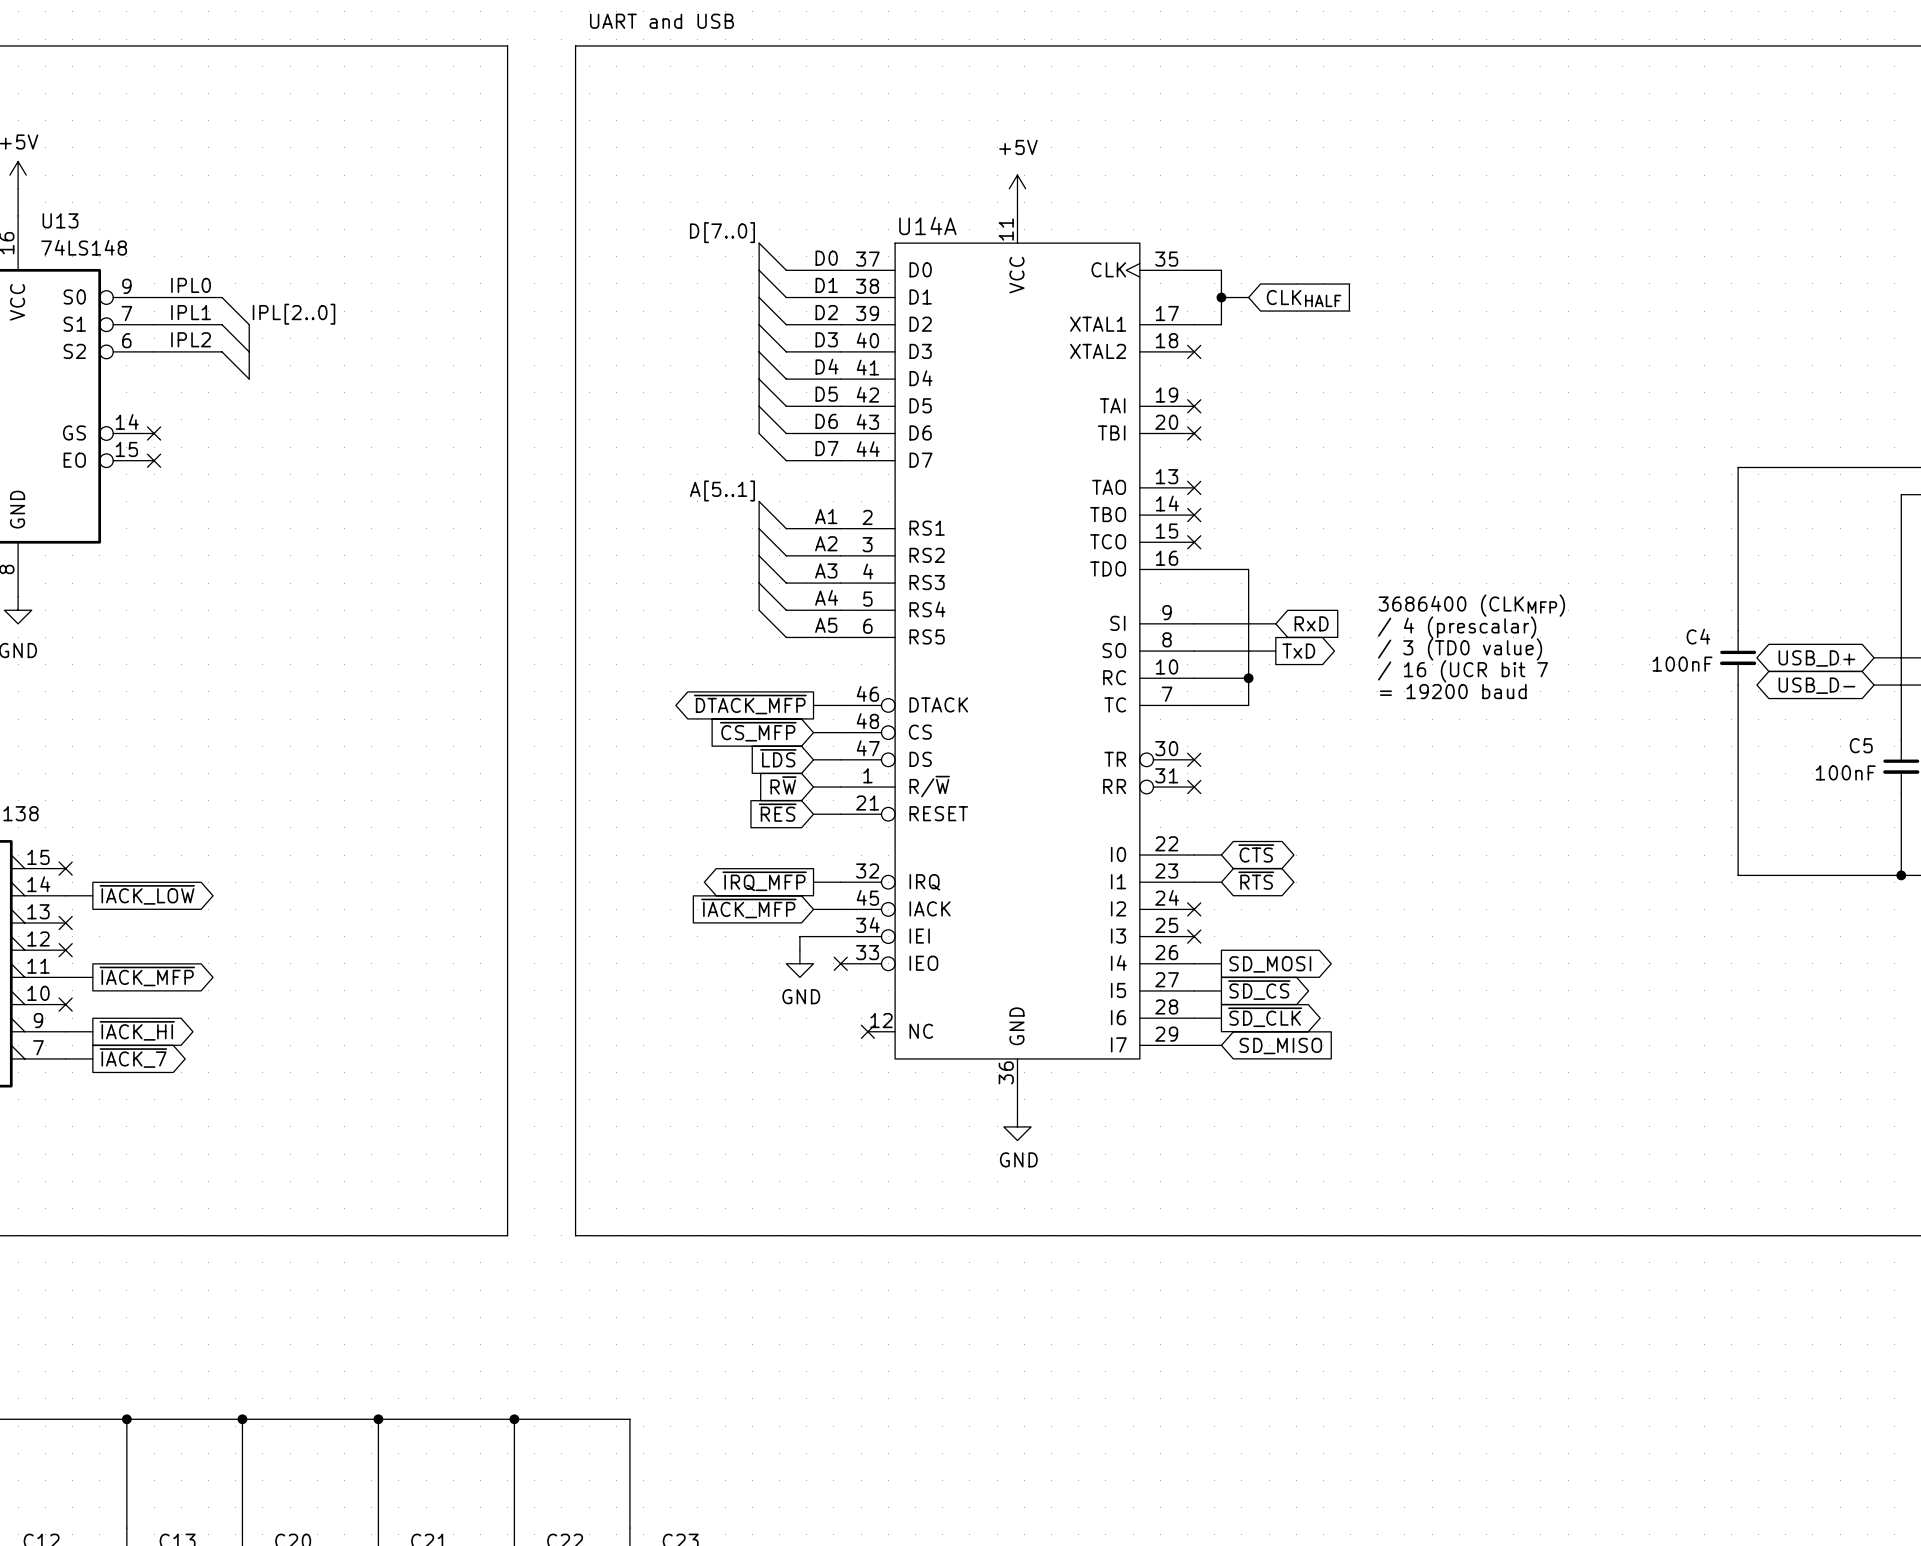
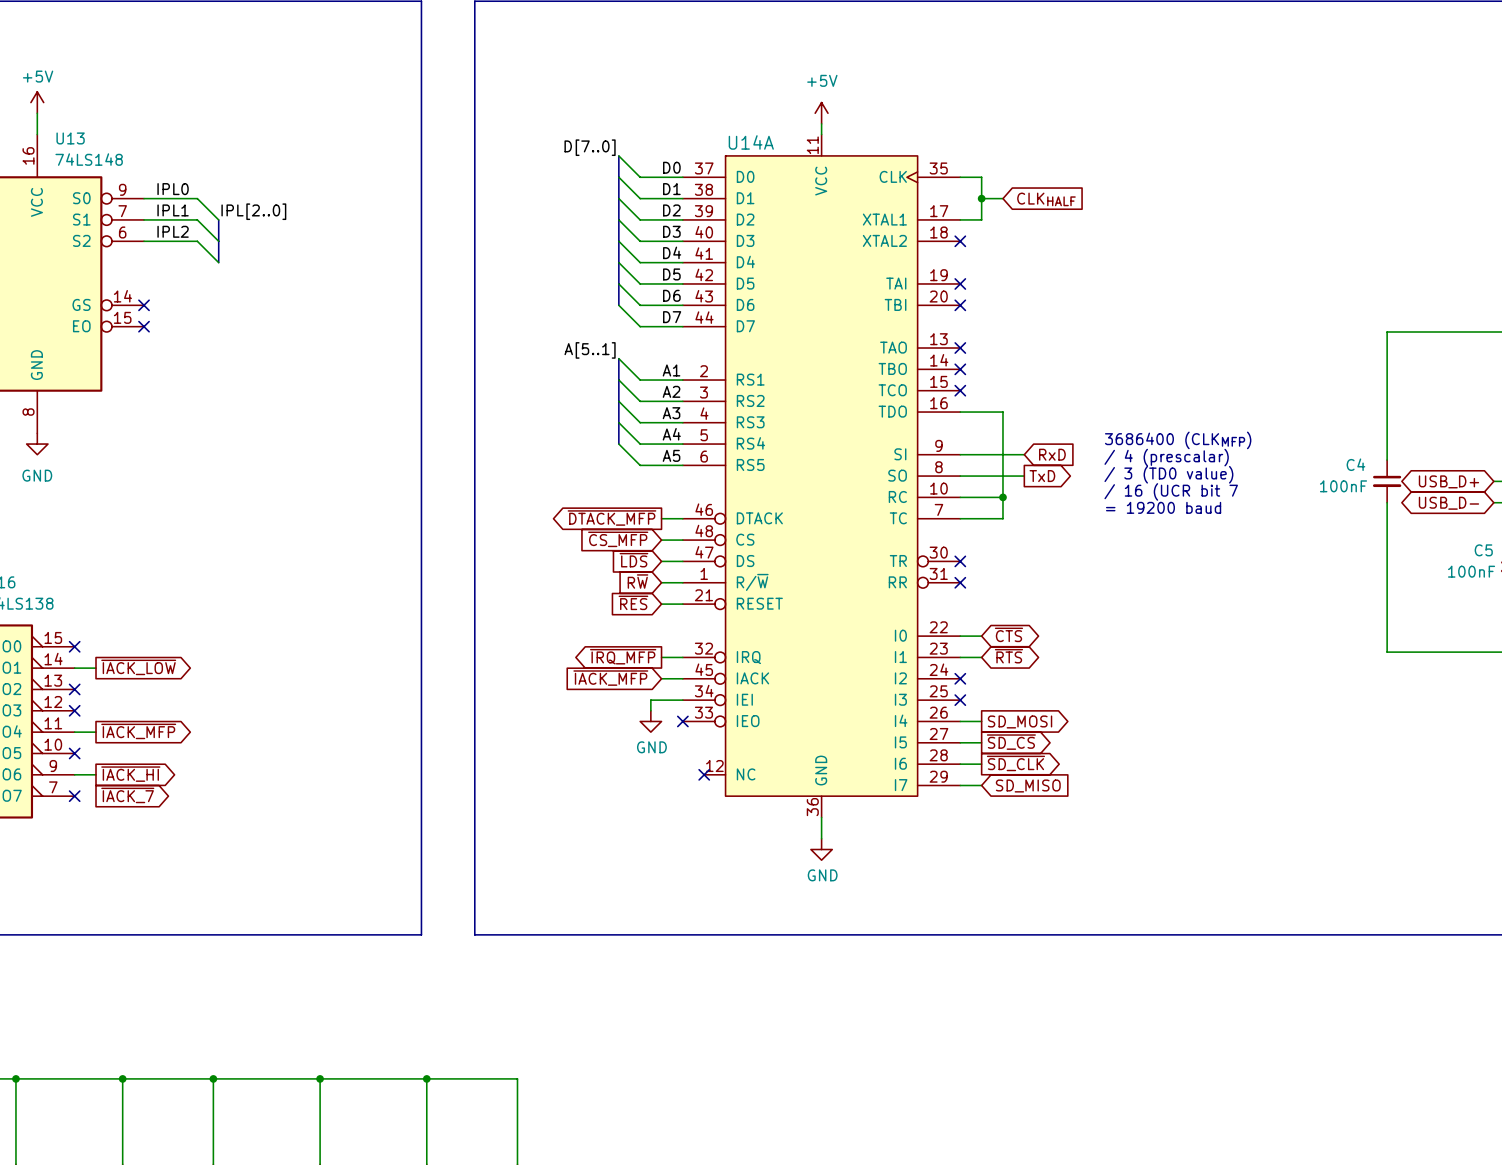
wire: (65, 1058) (92, 1058) -> none
no-connect mark: none -> (74, 796)

